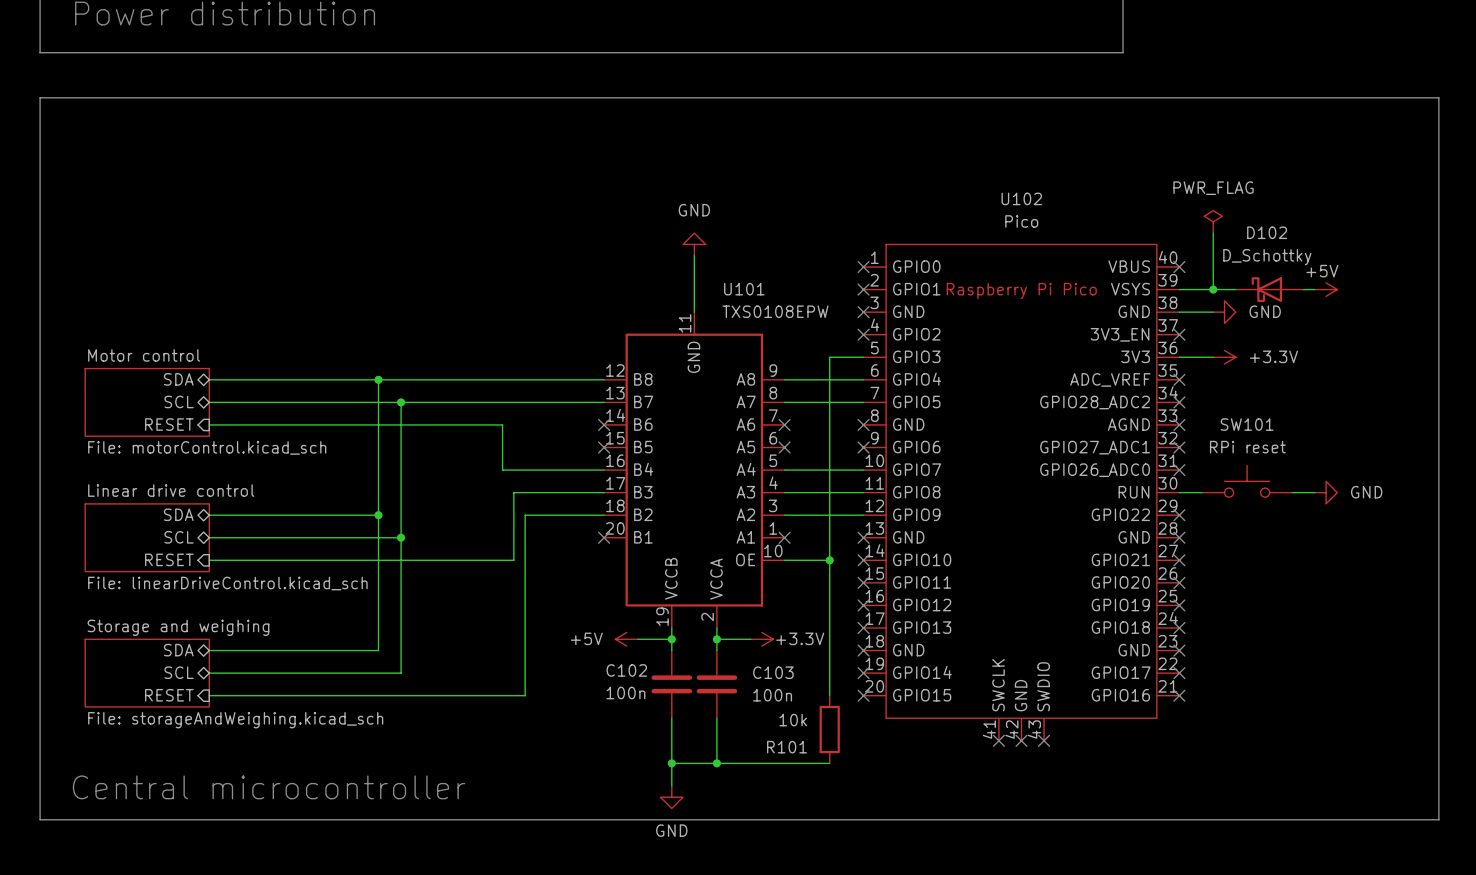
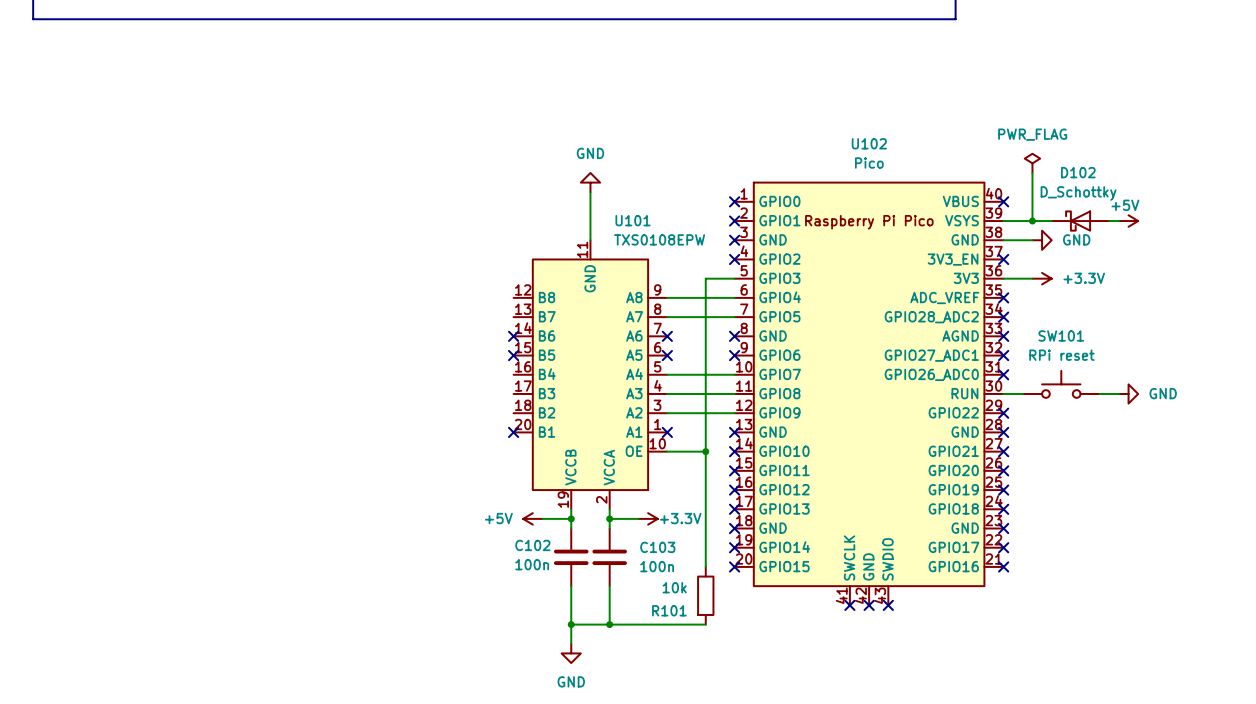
line: (40, 97) (1438, 97) (1438, 819) (40, 819) (40, 97) -> none
sheet pin: SDA (178, 379) -> none
wire: (209, 379) (604, 379) -> none
wire: (378, 379) (378, 650) (209, 650) -> none
junction: (378, 379) -> none
sheet pin: SCL (179, 401) -> none
sheet Motor control: File: motorControl.kicad_sch (147, 402) -> none
wire: (209, 402) (604, 402) -> none
wire: (401, 402) (401, 673) (209, 673) -> none
junction: (401, 402) -> none
sheet pin: RESET (169, 424) -> none
wire: (209, 424) (502, 424) (502, 470) (604, 470) -> none
wire: (604, 492) (513, 492) (513, 560) (209, 560) -> none
sheet pin: SDA (178, 514) -> none
wire: (209, 515) (378, 515) -> none
junction: (378, 515) -> none
wire: (604, 515) (525, 515) (525, 695) (209, 695) -> none
sheet Linear drive control: File: linearDriveControl.kicad_sch (147, 537) -> none
sheet pin: SCL (179, 537) -> none
wire: (209, 537) (401, 537) -> none
junction: (401, 537) -> none
sheet pin: RESET (169, 559) -> none
sheet pin: SDA (178, 650) -> none
sheet pin: SCL (179, 672) -> none
sheet Storage and weighing: File: storageAndWeighing.kicad_sch (147, 673) -> none
sheet pin: RESET (169, 695) -> none
text: Central microcontroller (269, 787) -> none

